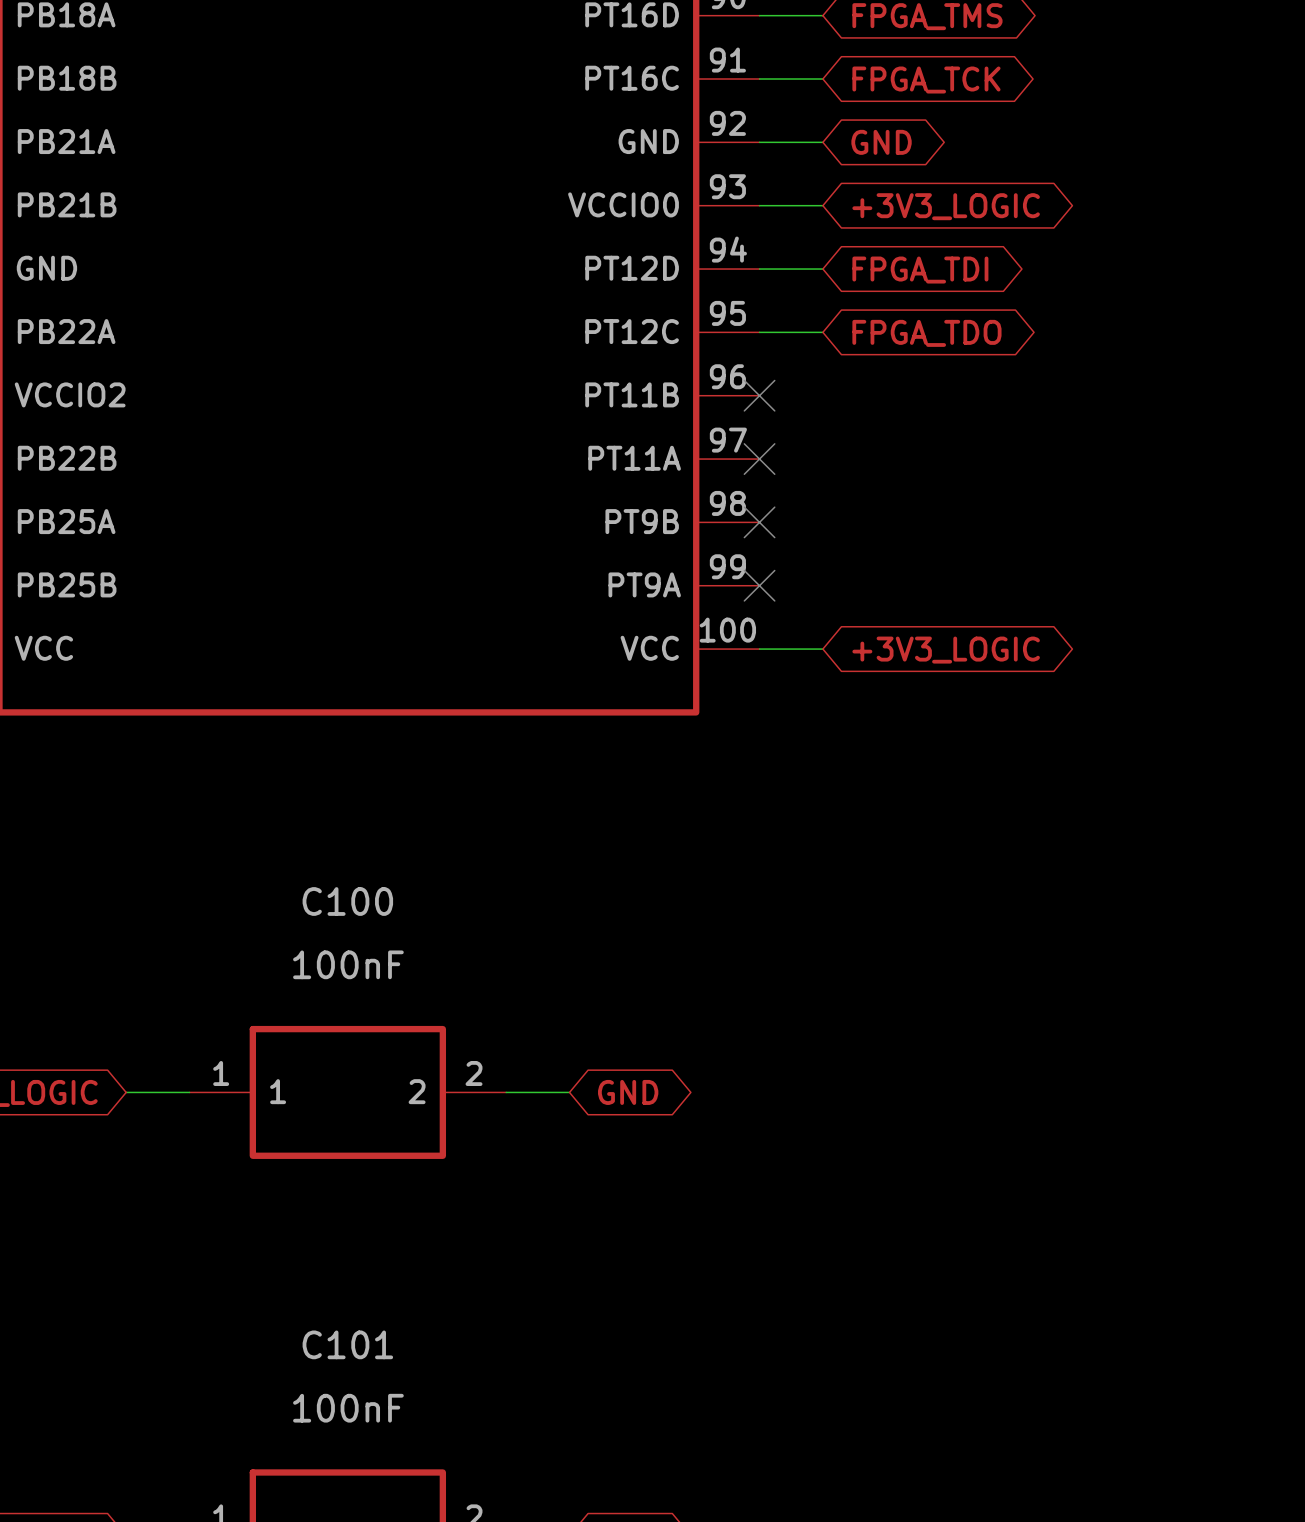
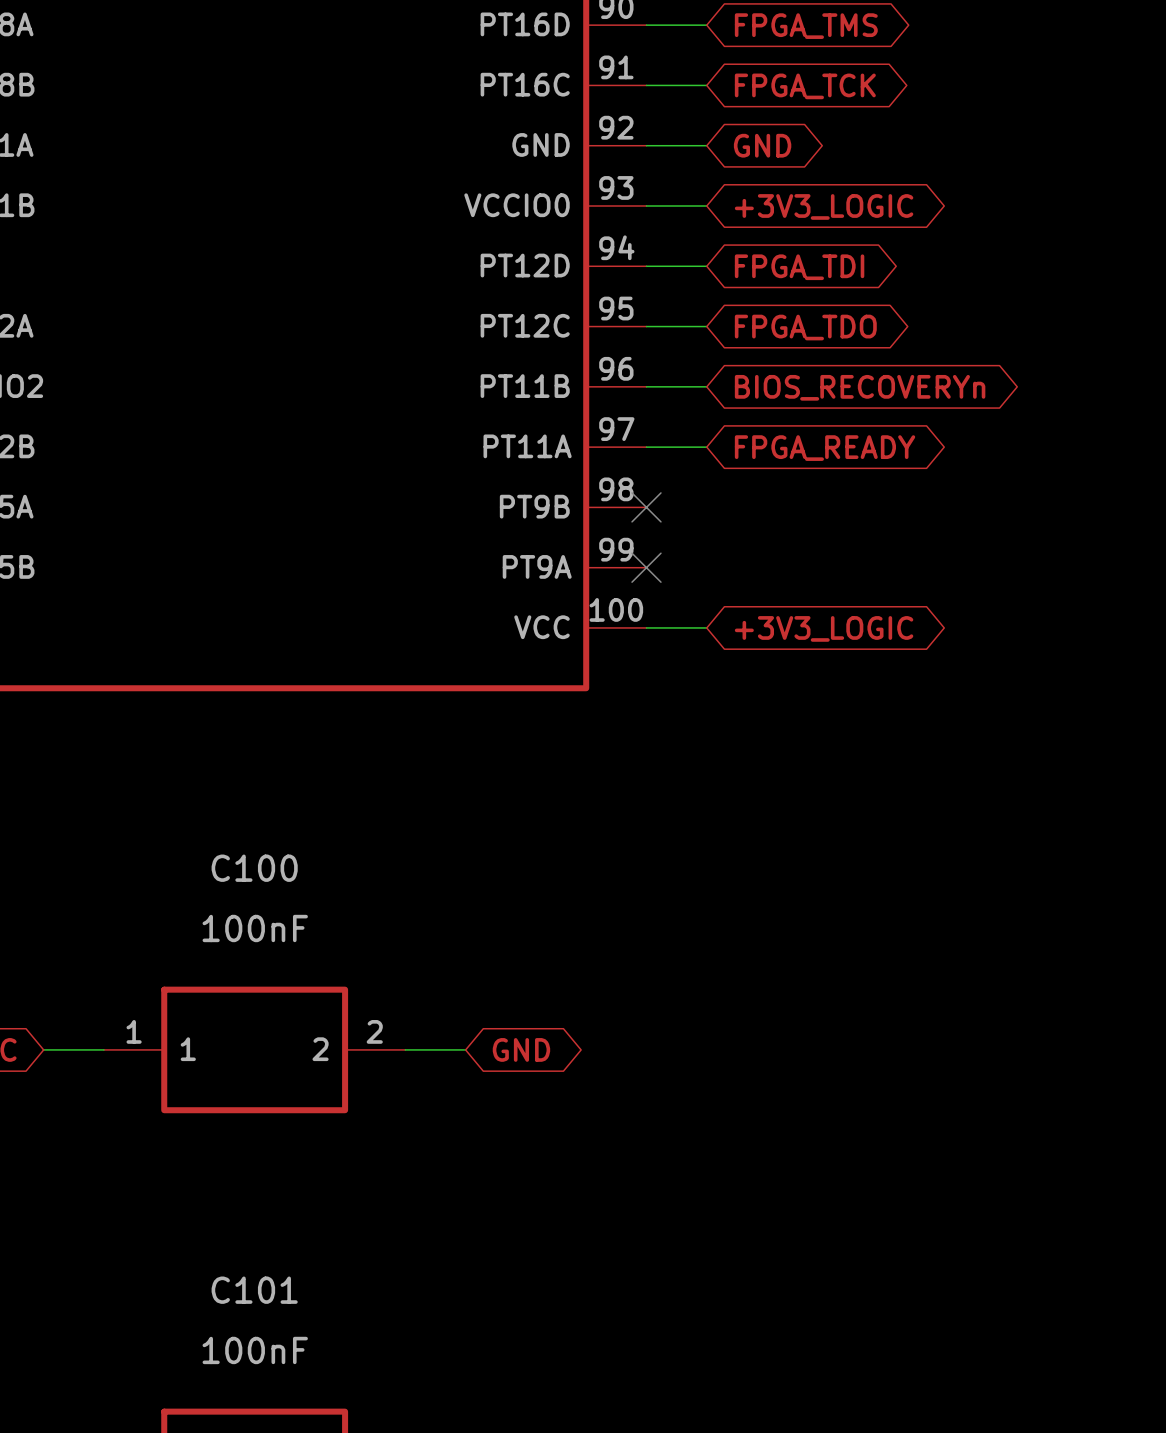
wire: none -> (646, 386) (706, 386)
no-connect mark: (759, 395) -> none
global label: none -> BIOS_RECOVERYn (860, 387)
wire: none -> (646, 447) (706, 447)
no-connect mark: (759, 459) -> none
global label: none -> FPGA_READY (825, 448)

